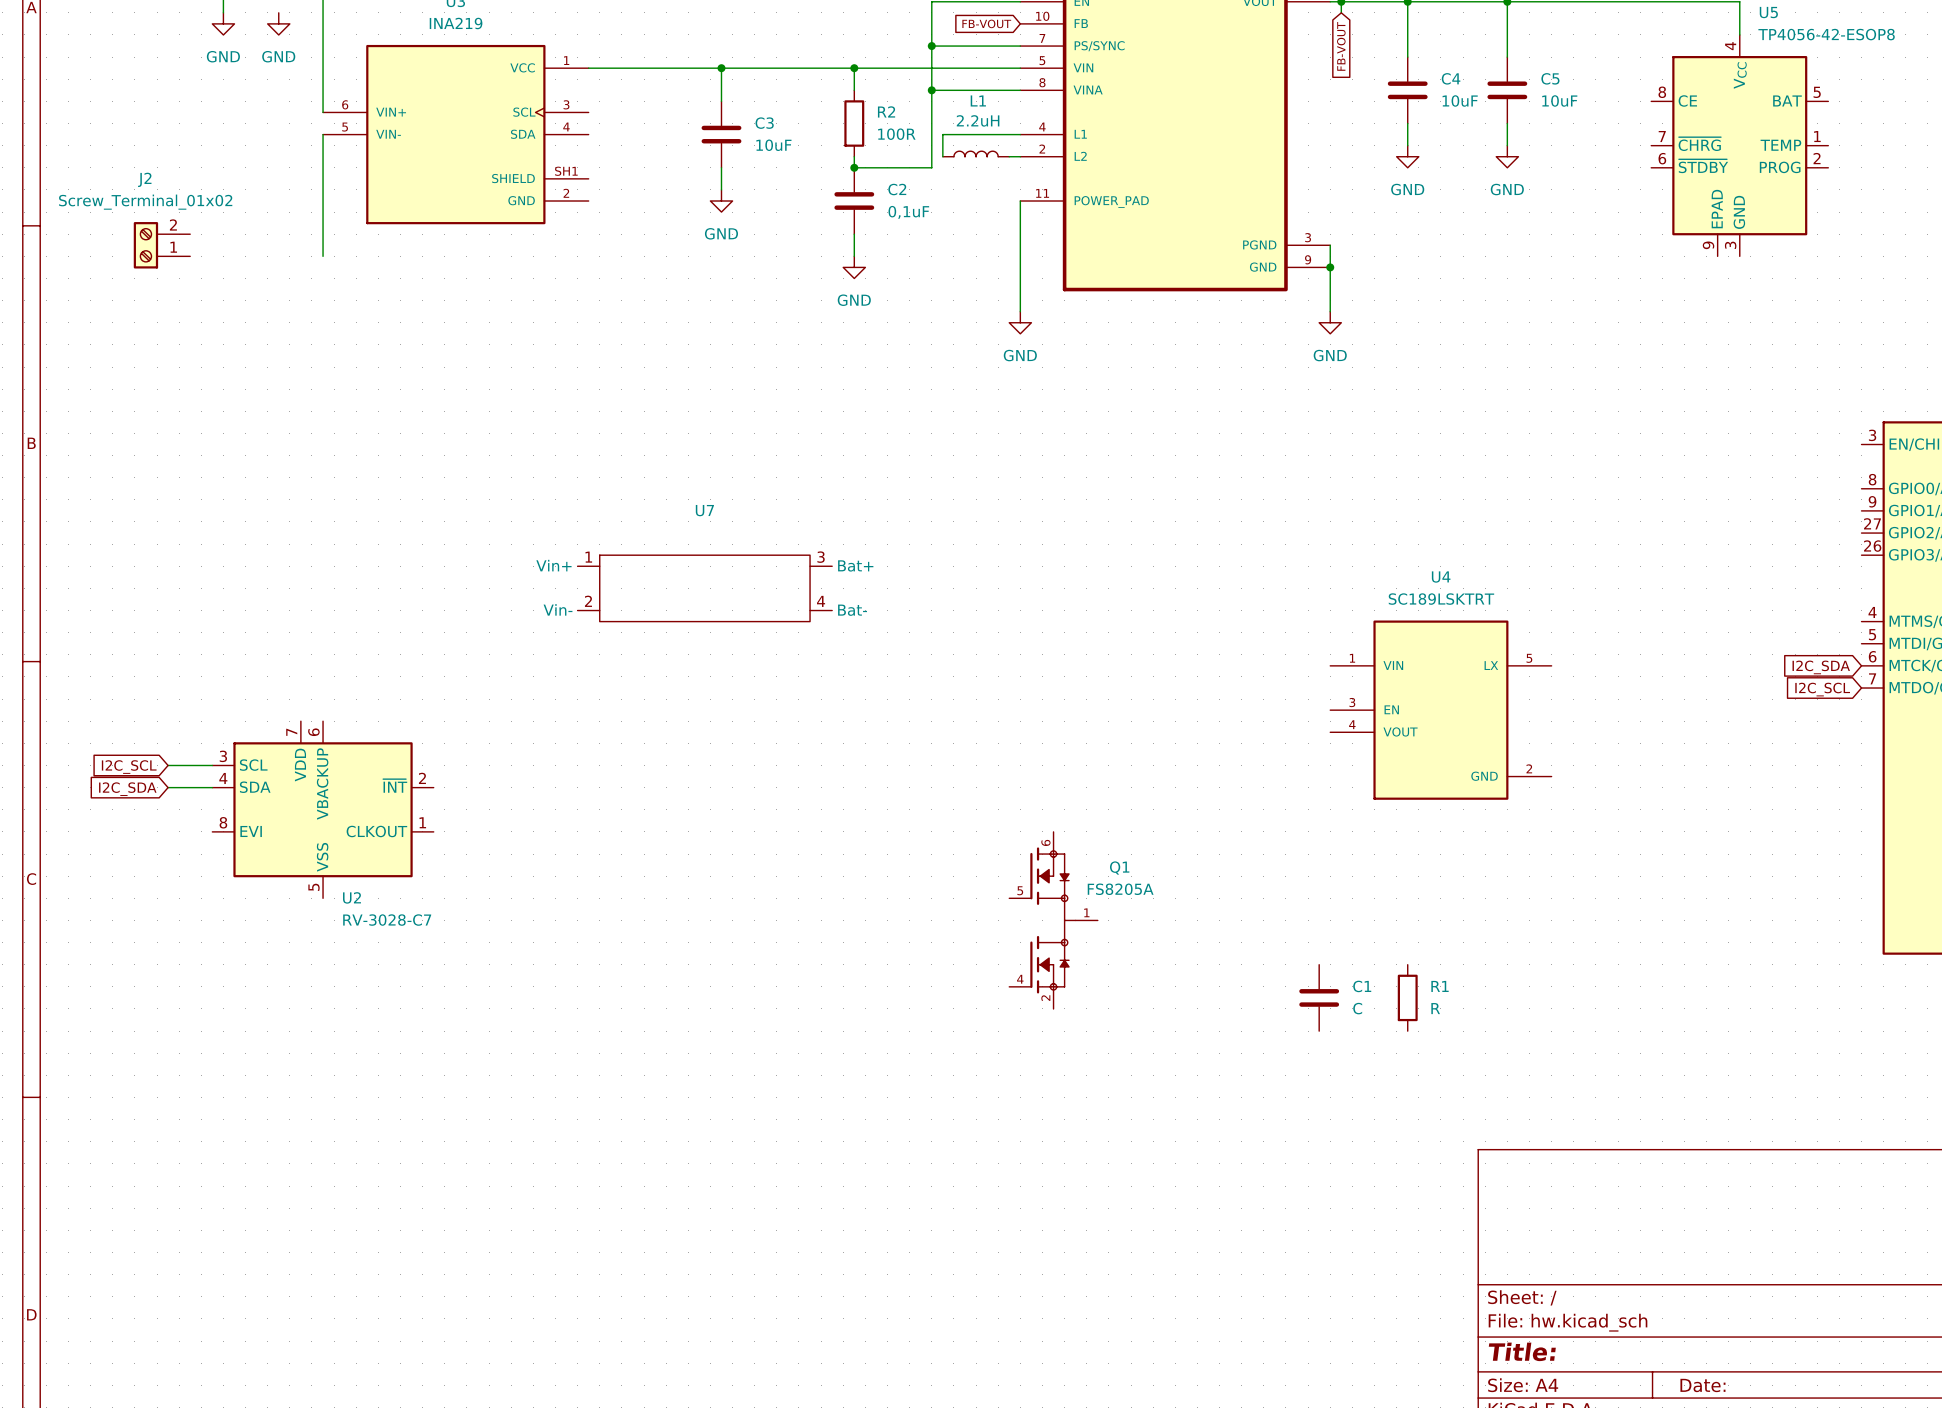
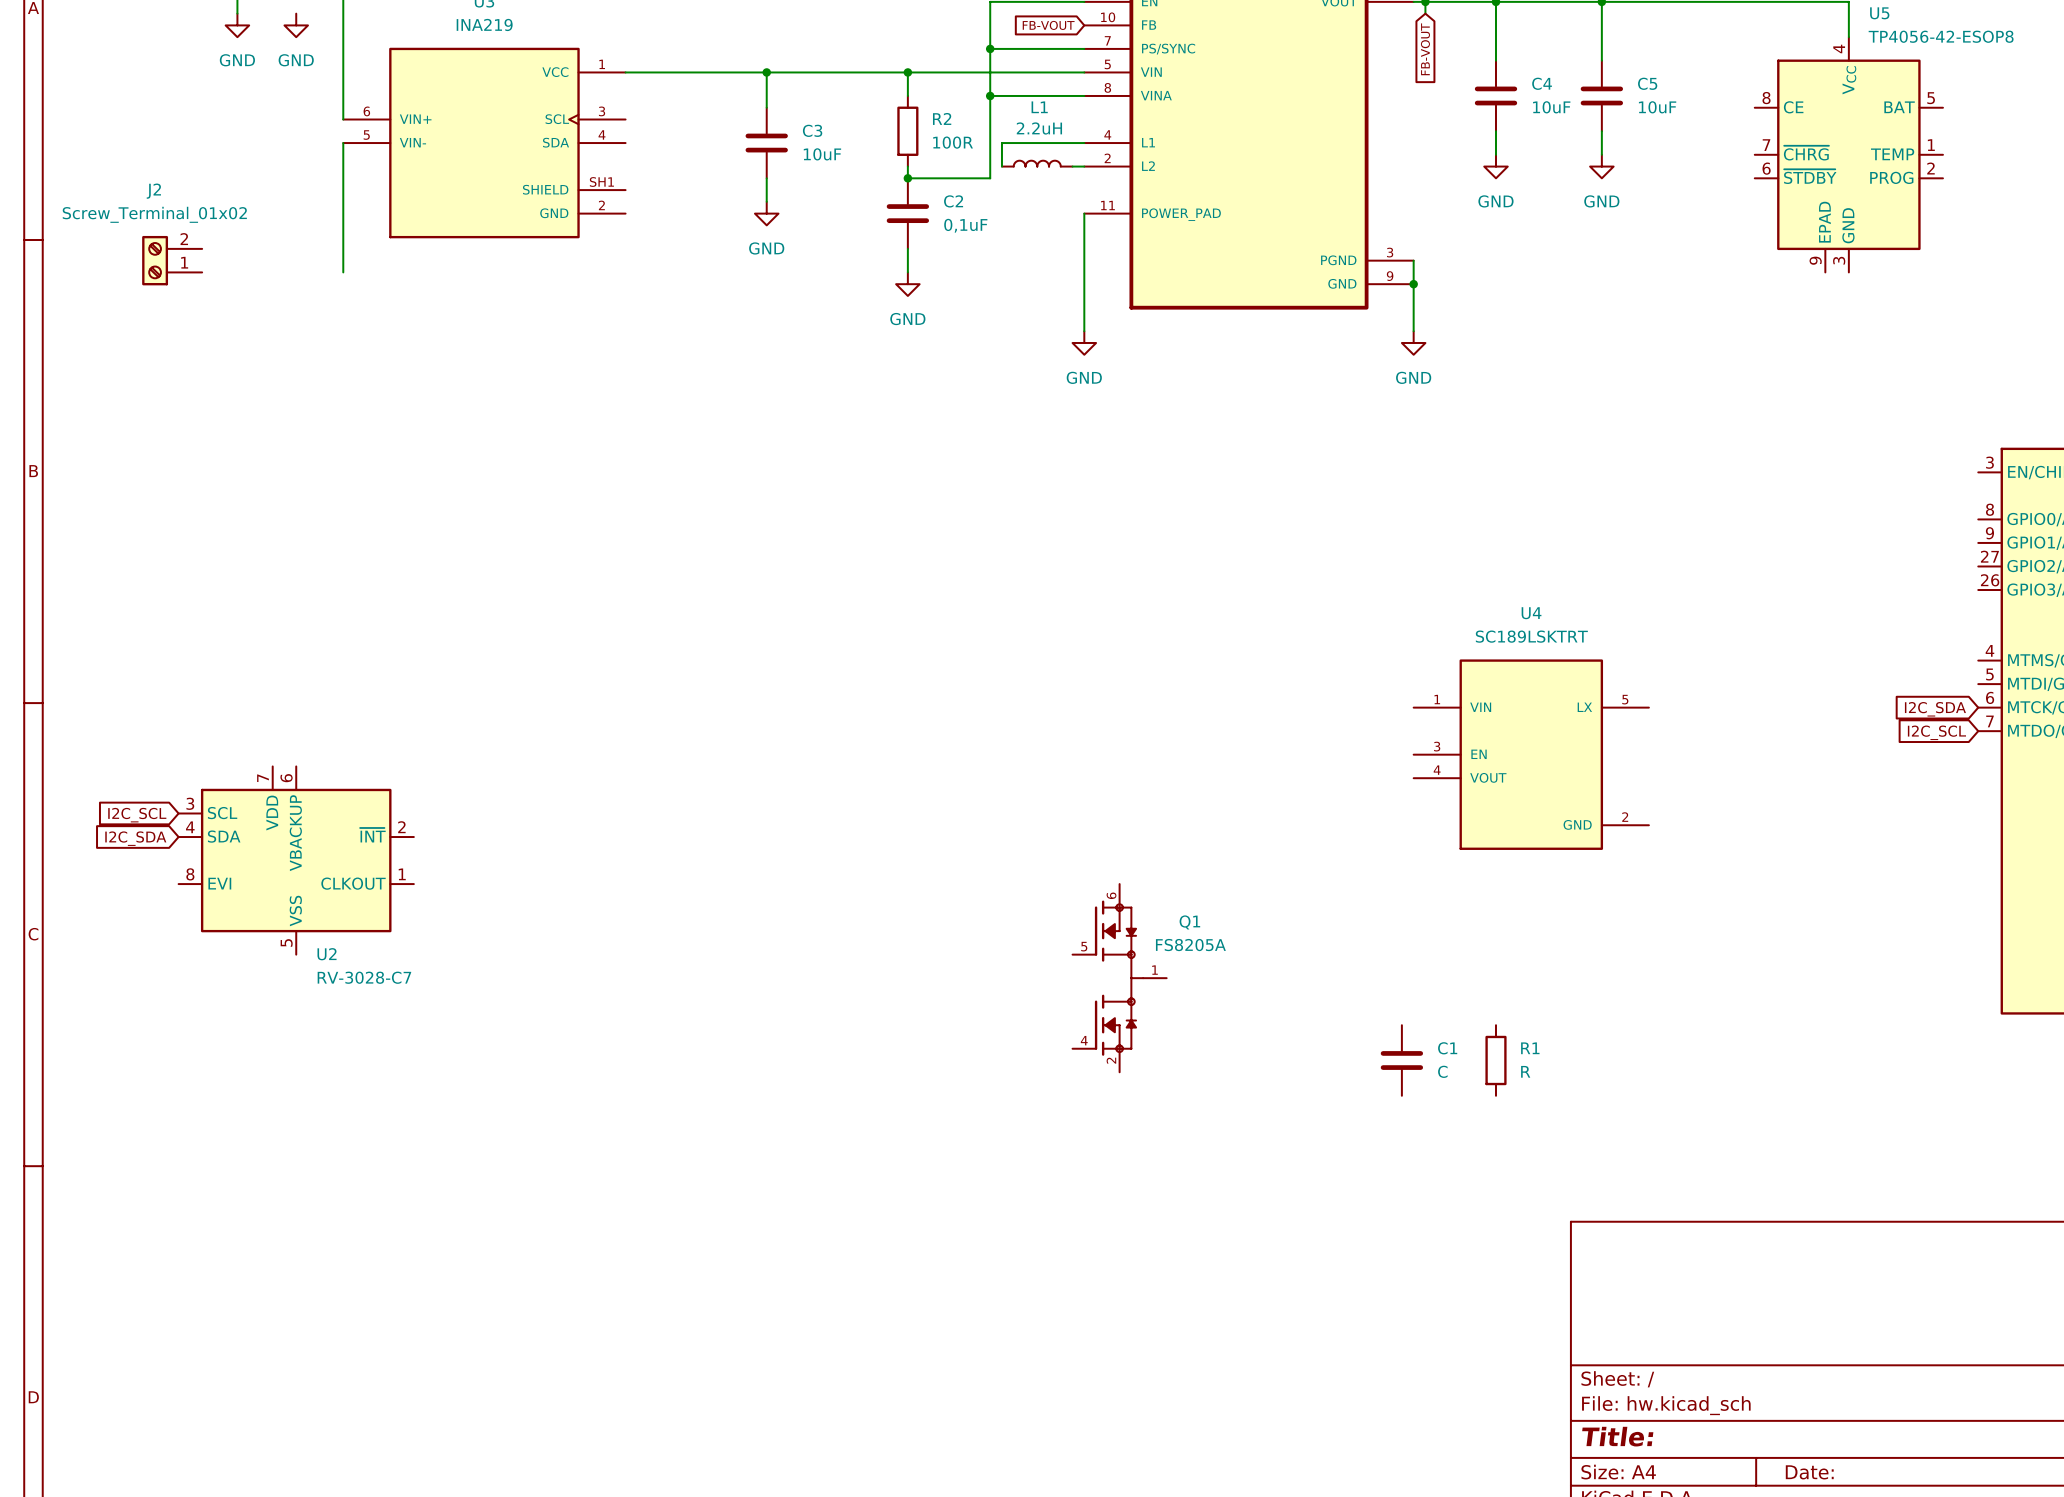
U7: (704, 588) -> none
U2 position: (323, 809) -> (296, 860)

